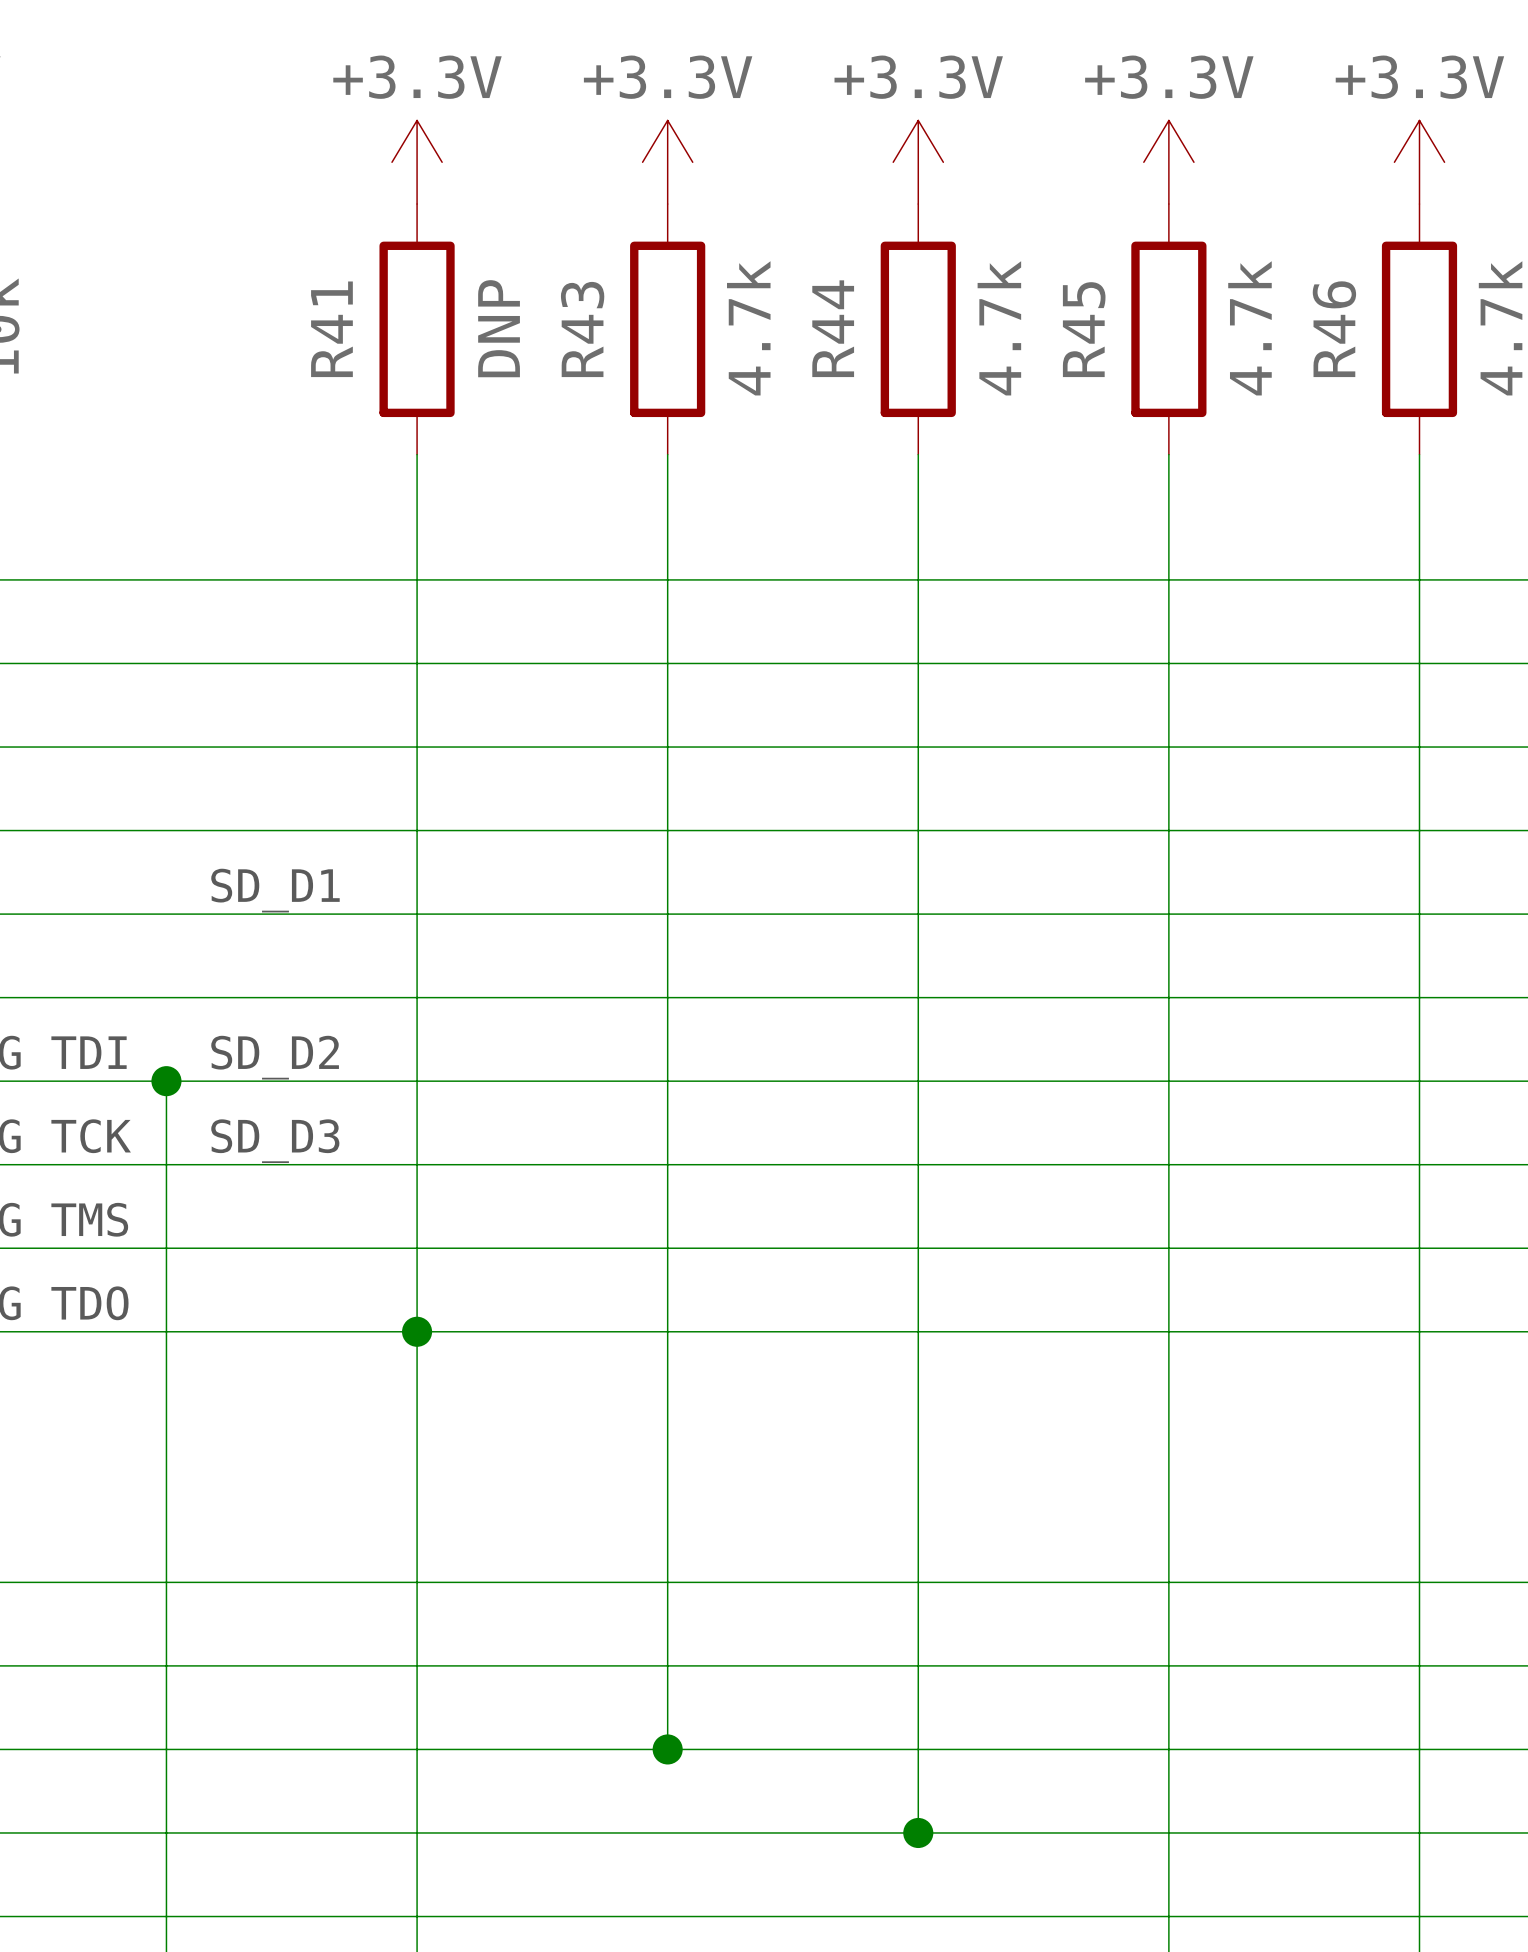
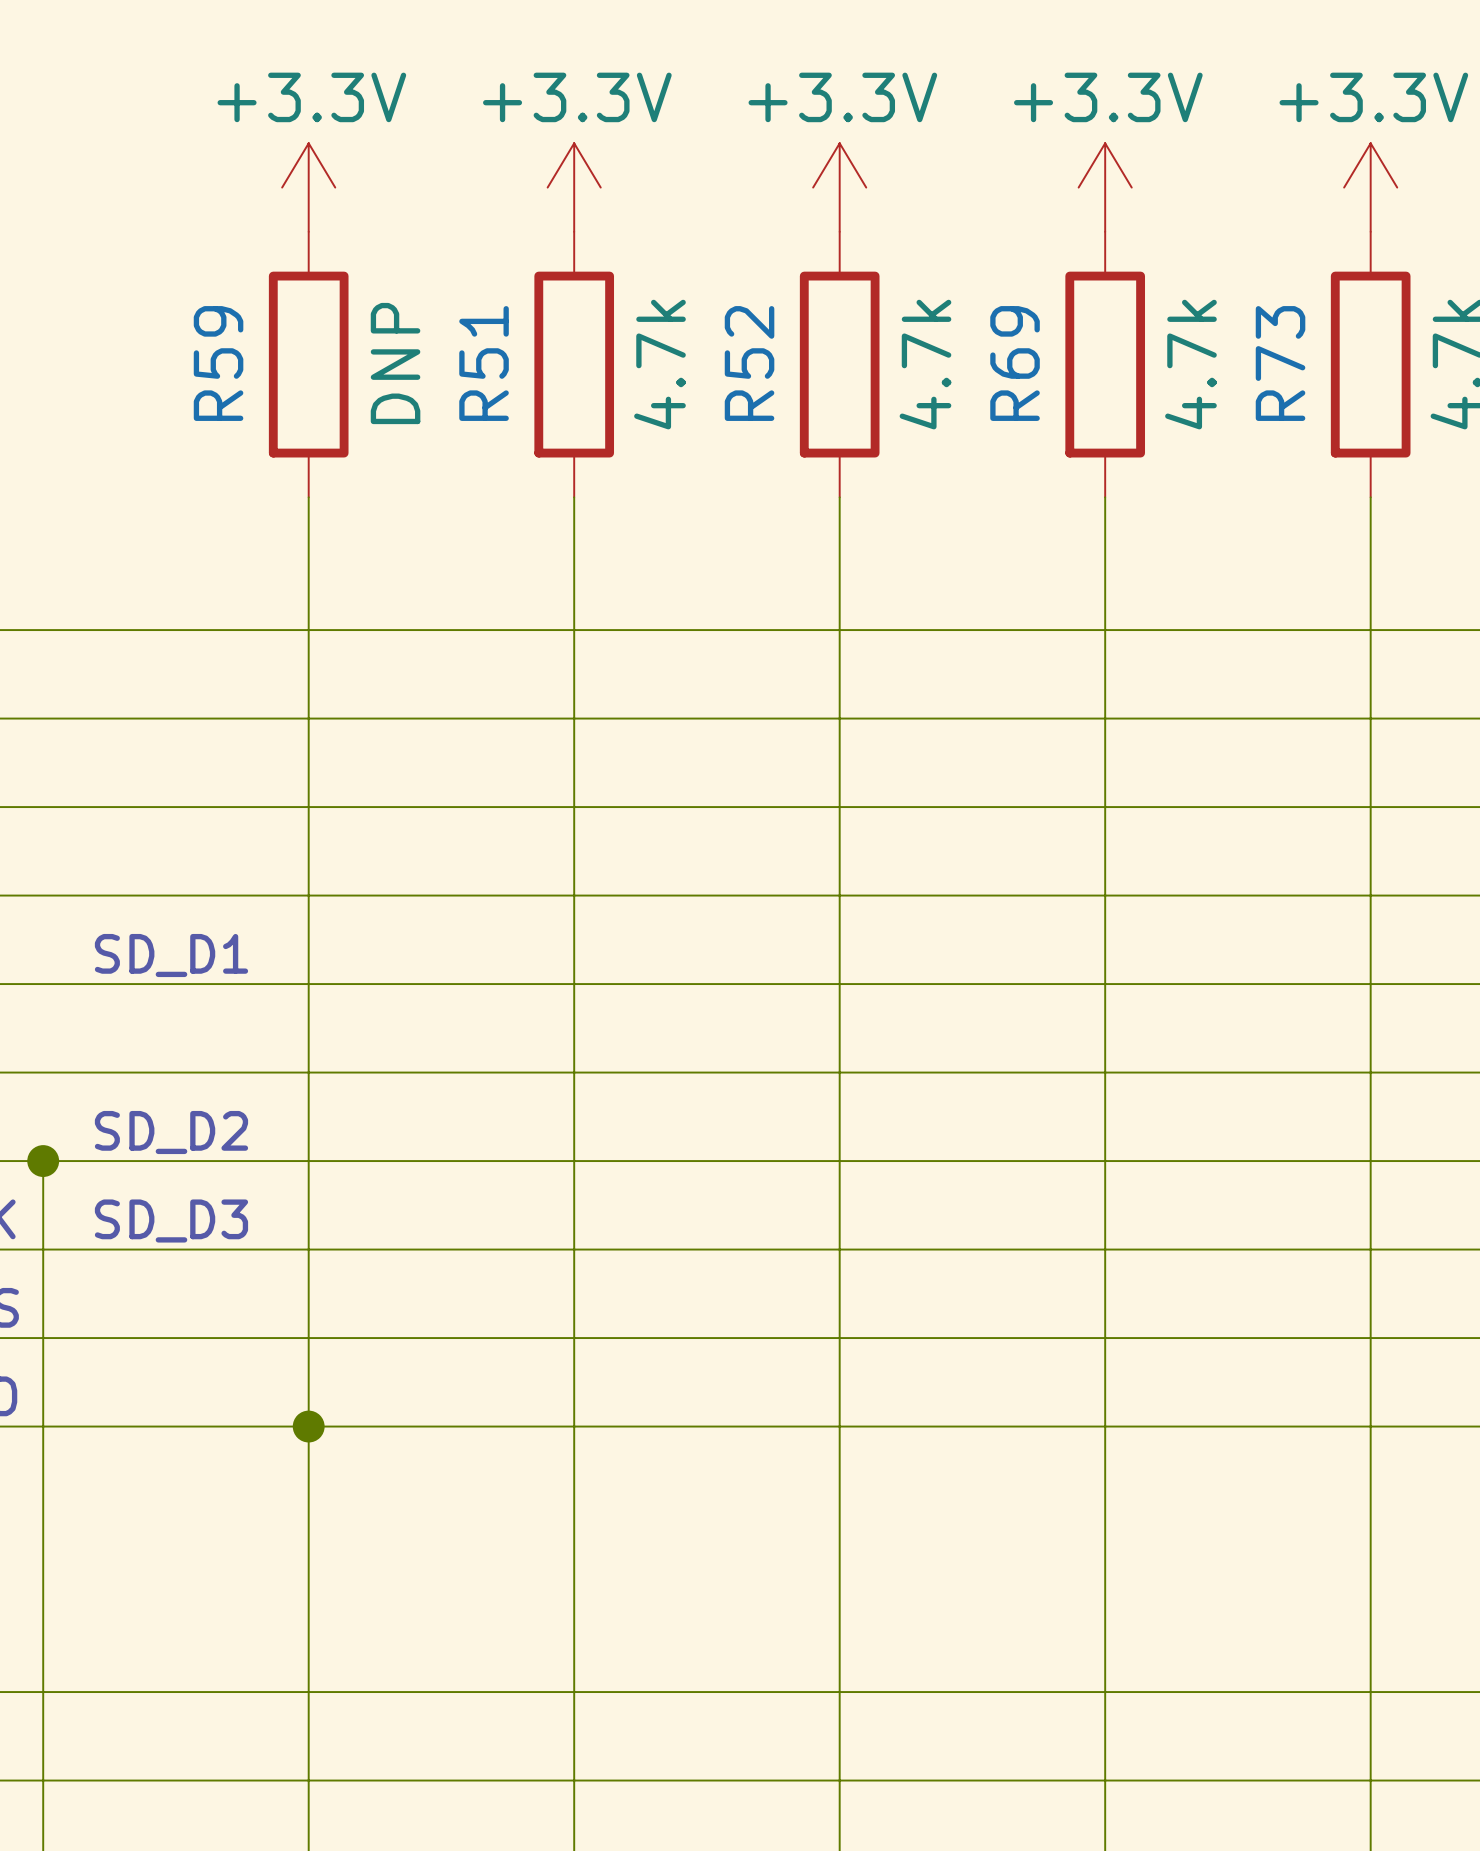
R44 name: R44 (833, 328) -> R52 (749, 363)
R41 name: R41 (331, 329) -> R59 (218, 363)
R43 name: R43 (582, 329) -> R51 (484, 363)
R45 name: R45 (1084, 329) -> R69 (1015, 363)
R46 name: R46 (1334, 329) -> R73 (1280, 363)

